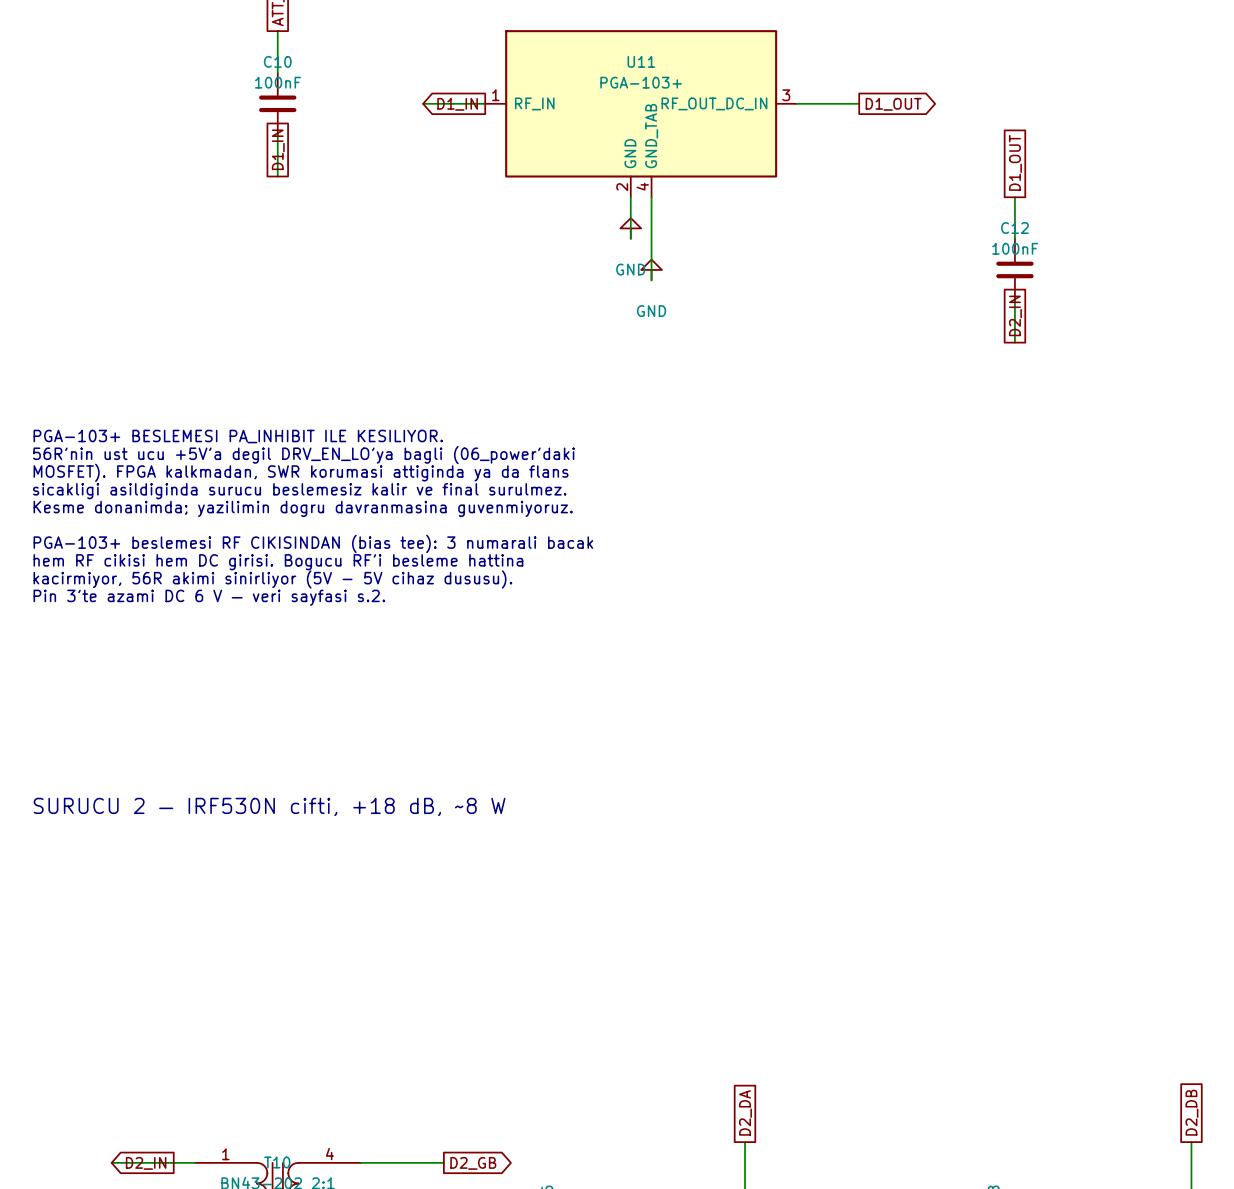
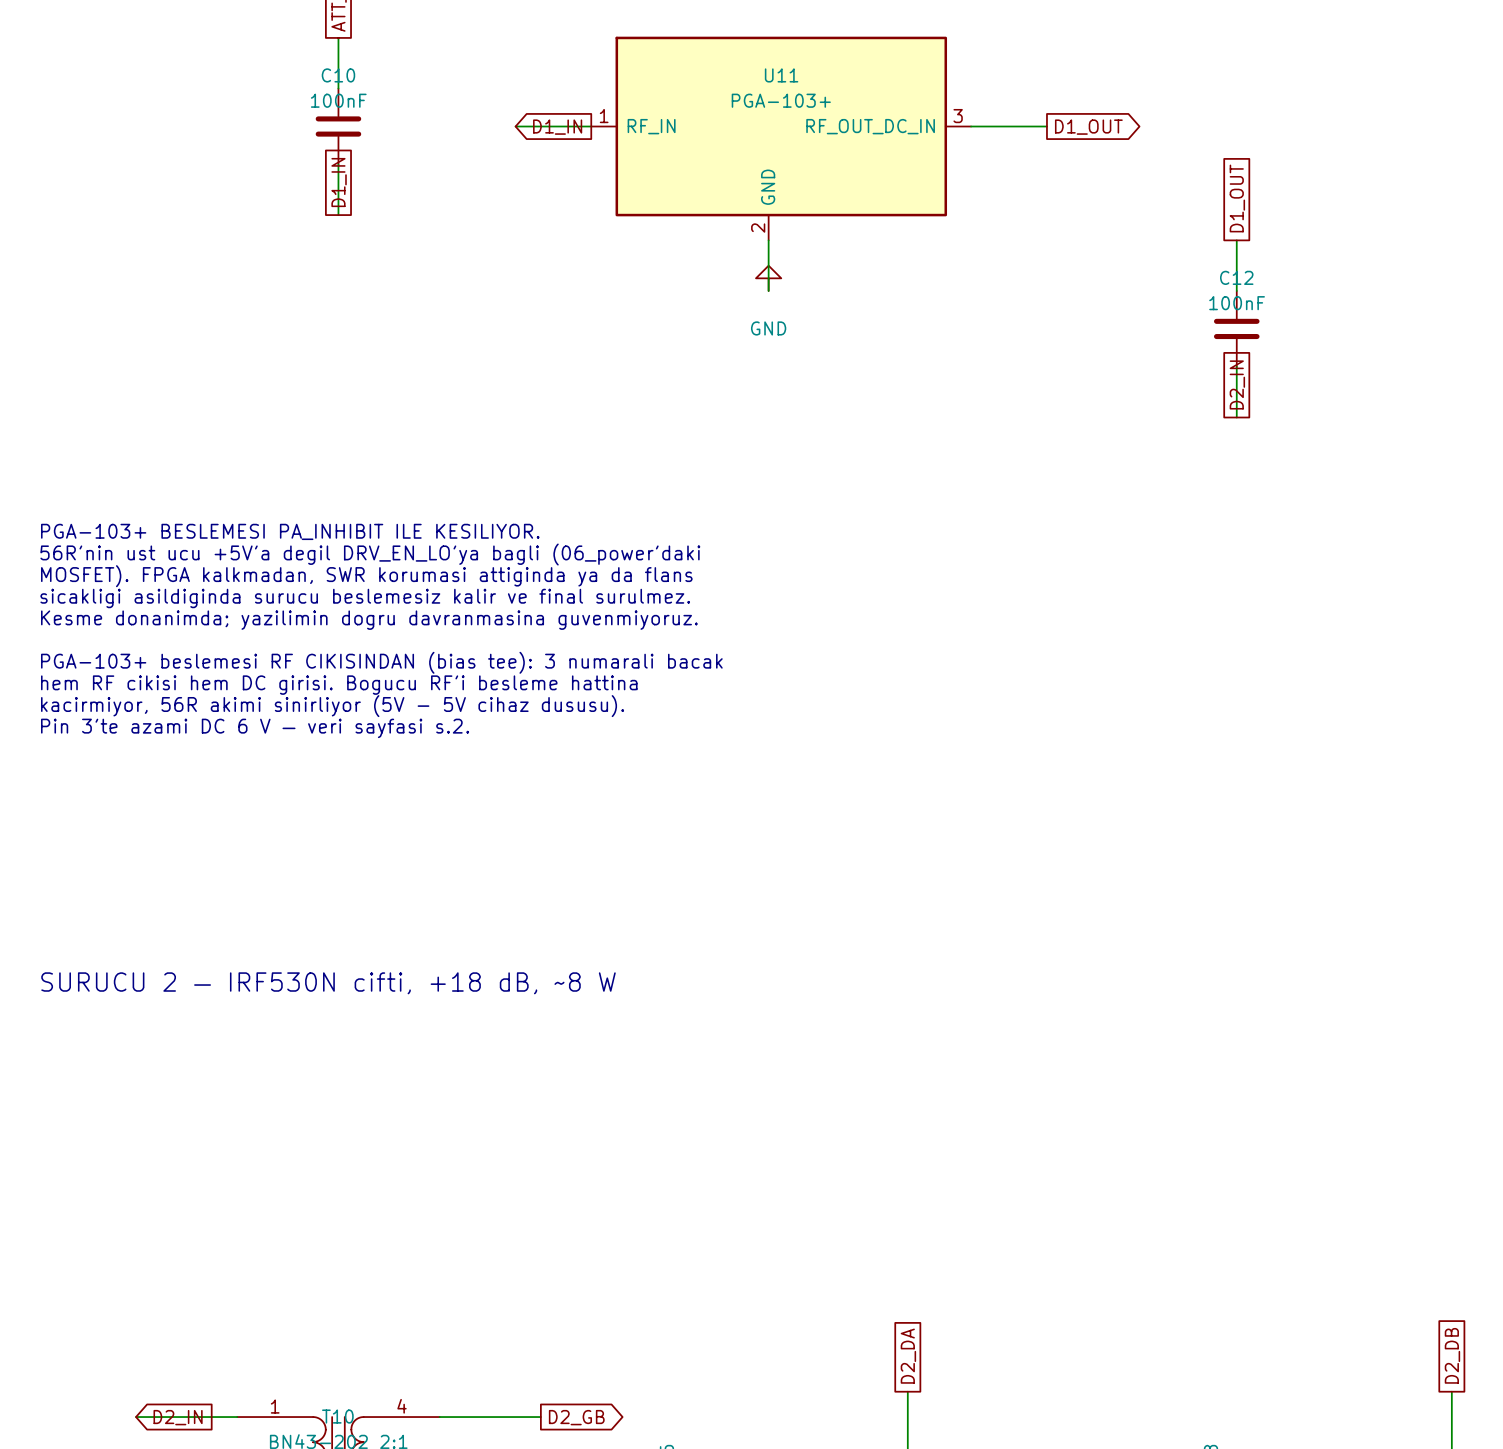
U11 symbol: [485, 30, 797, 198] -> [591, 36, 972, 241]
wire: (651, 197) (651, 280) -> none
power symbol: GND (651, 269) -> none

